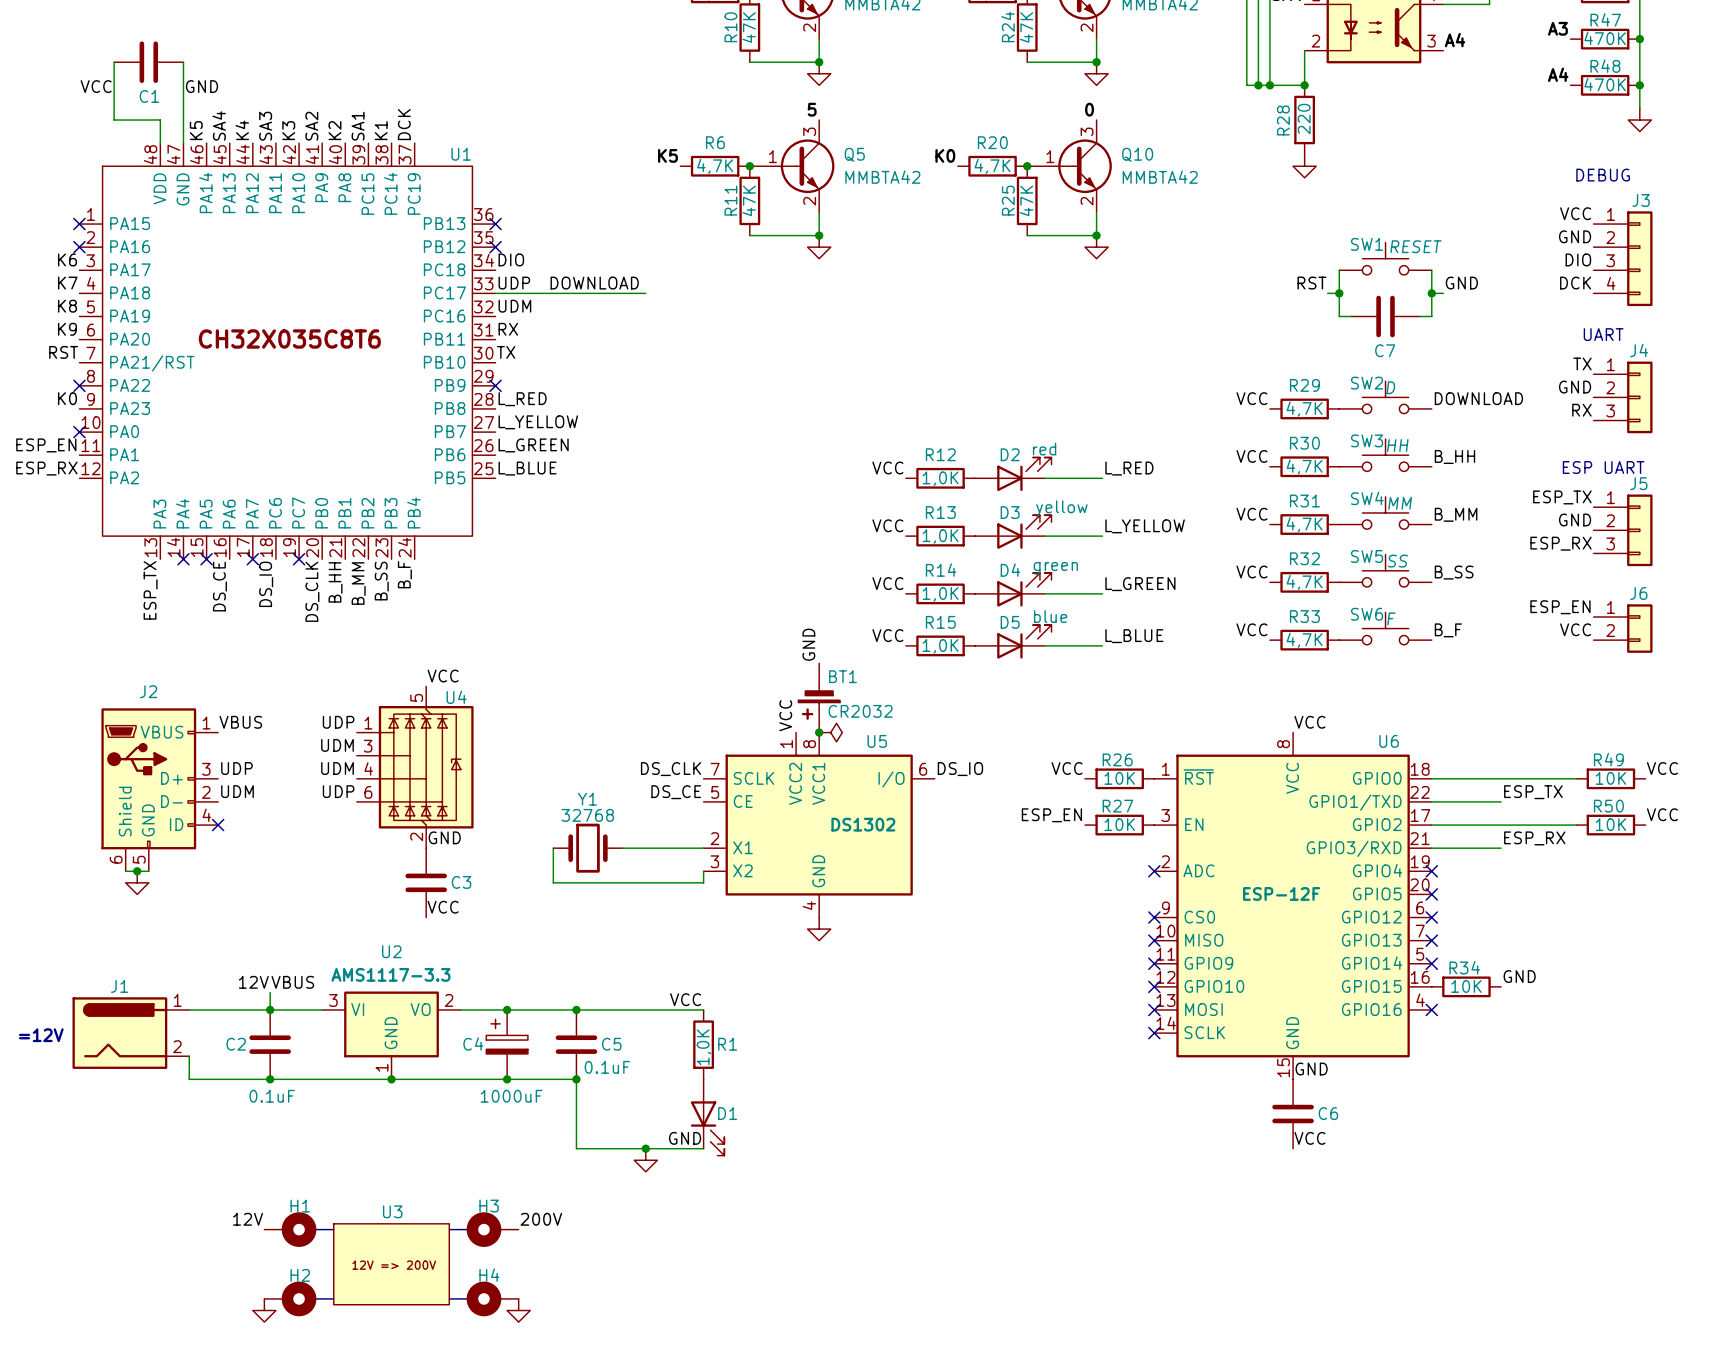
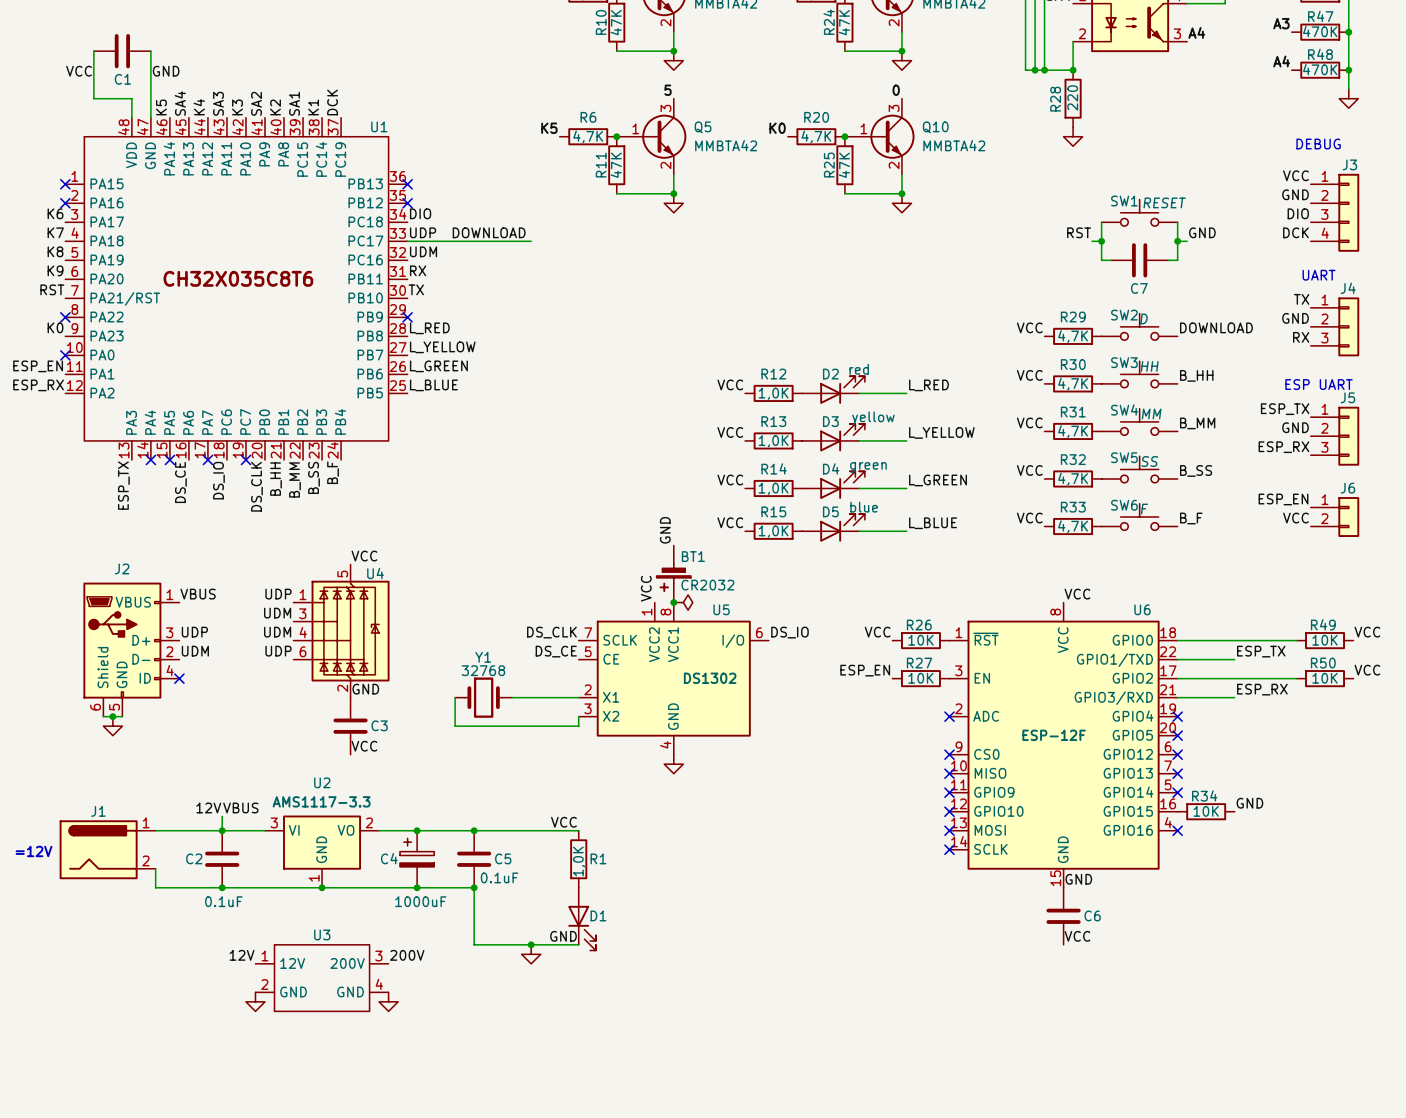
label position: 12V (248, 1219) -> 12V (242, 955)
label position: 200V (541, 1219) -> 200V (407, 955)
U3 symbol: [333, 1223, 450, 1305] -> [255, 944, 389, 1012]
H1: (290, 1229) -> none
line: (316, 1229) (333, 1229) -> none
line: (449, 1229) (466, 1229) -> none
H3: (492, 1229) -> none
H2: (290, 1298) -> none
line: (316, 1298) (333, 1298) -> none
line: (449, 1298) (466, 1298) -> none
H4: (492, 1298) -> none
power symbol position: (264, 1310) -> (255, 1001)
power symbol position: (518, 1310) -> (388, 1001)

